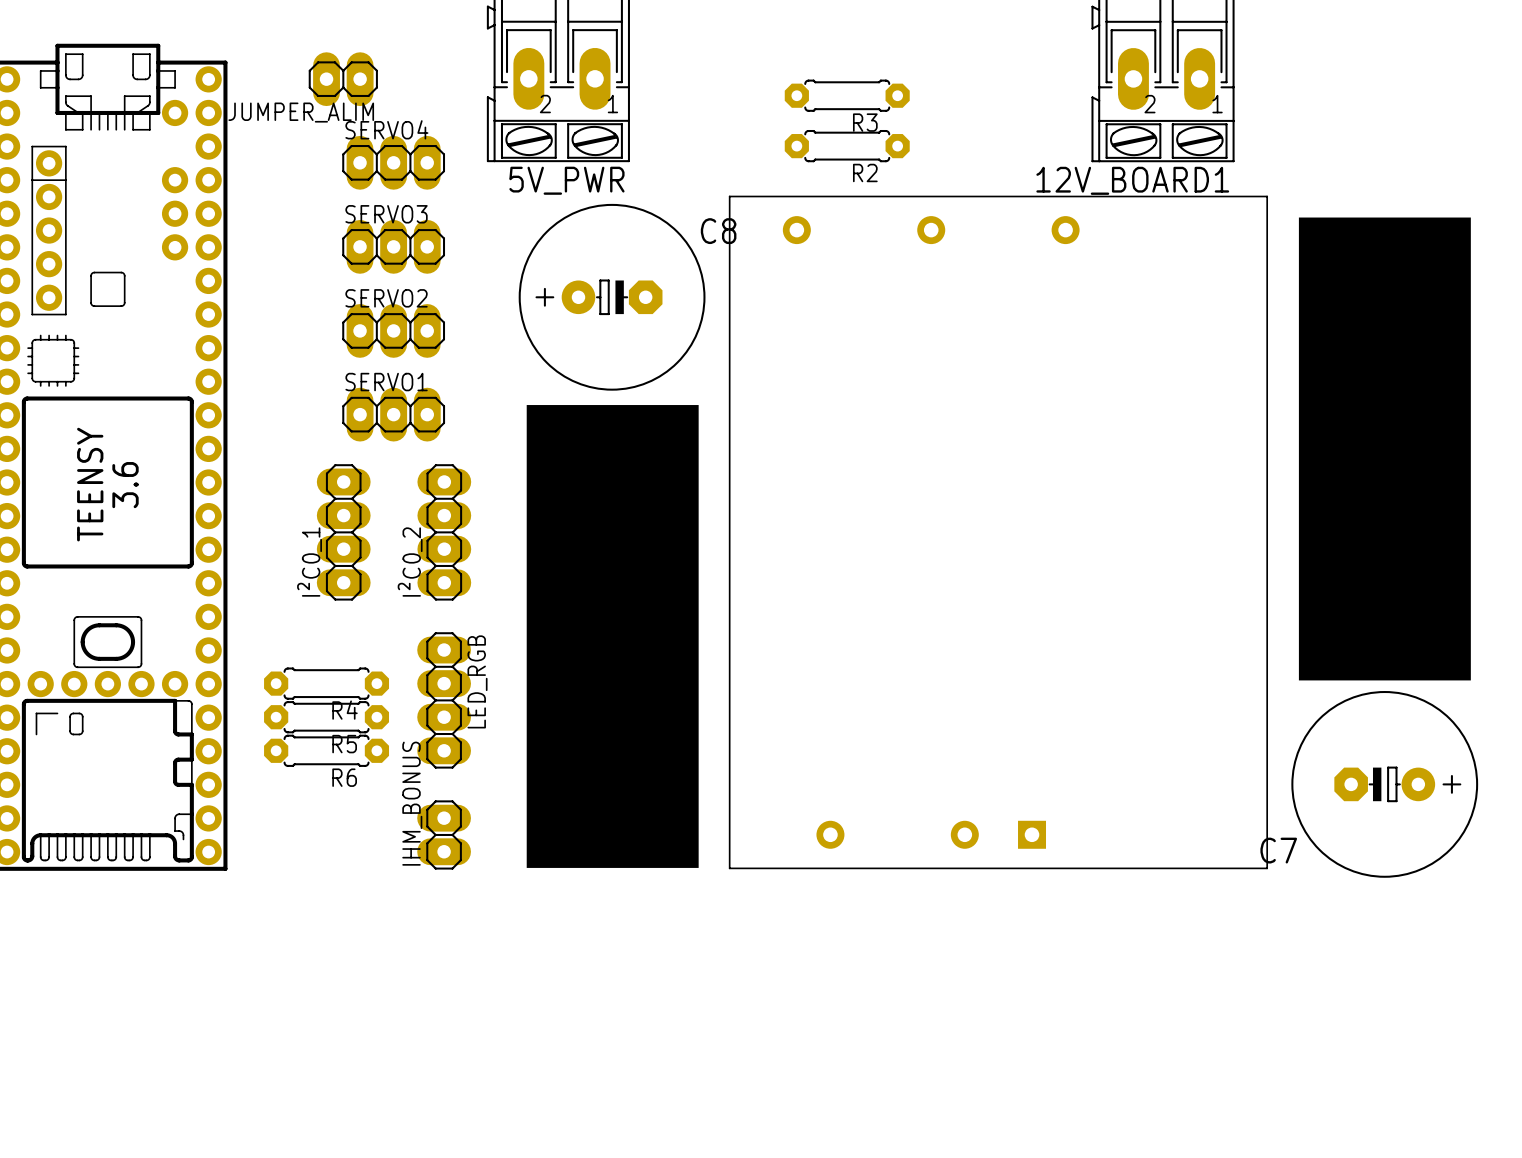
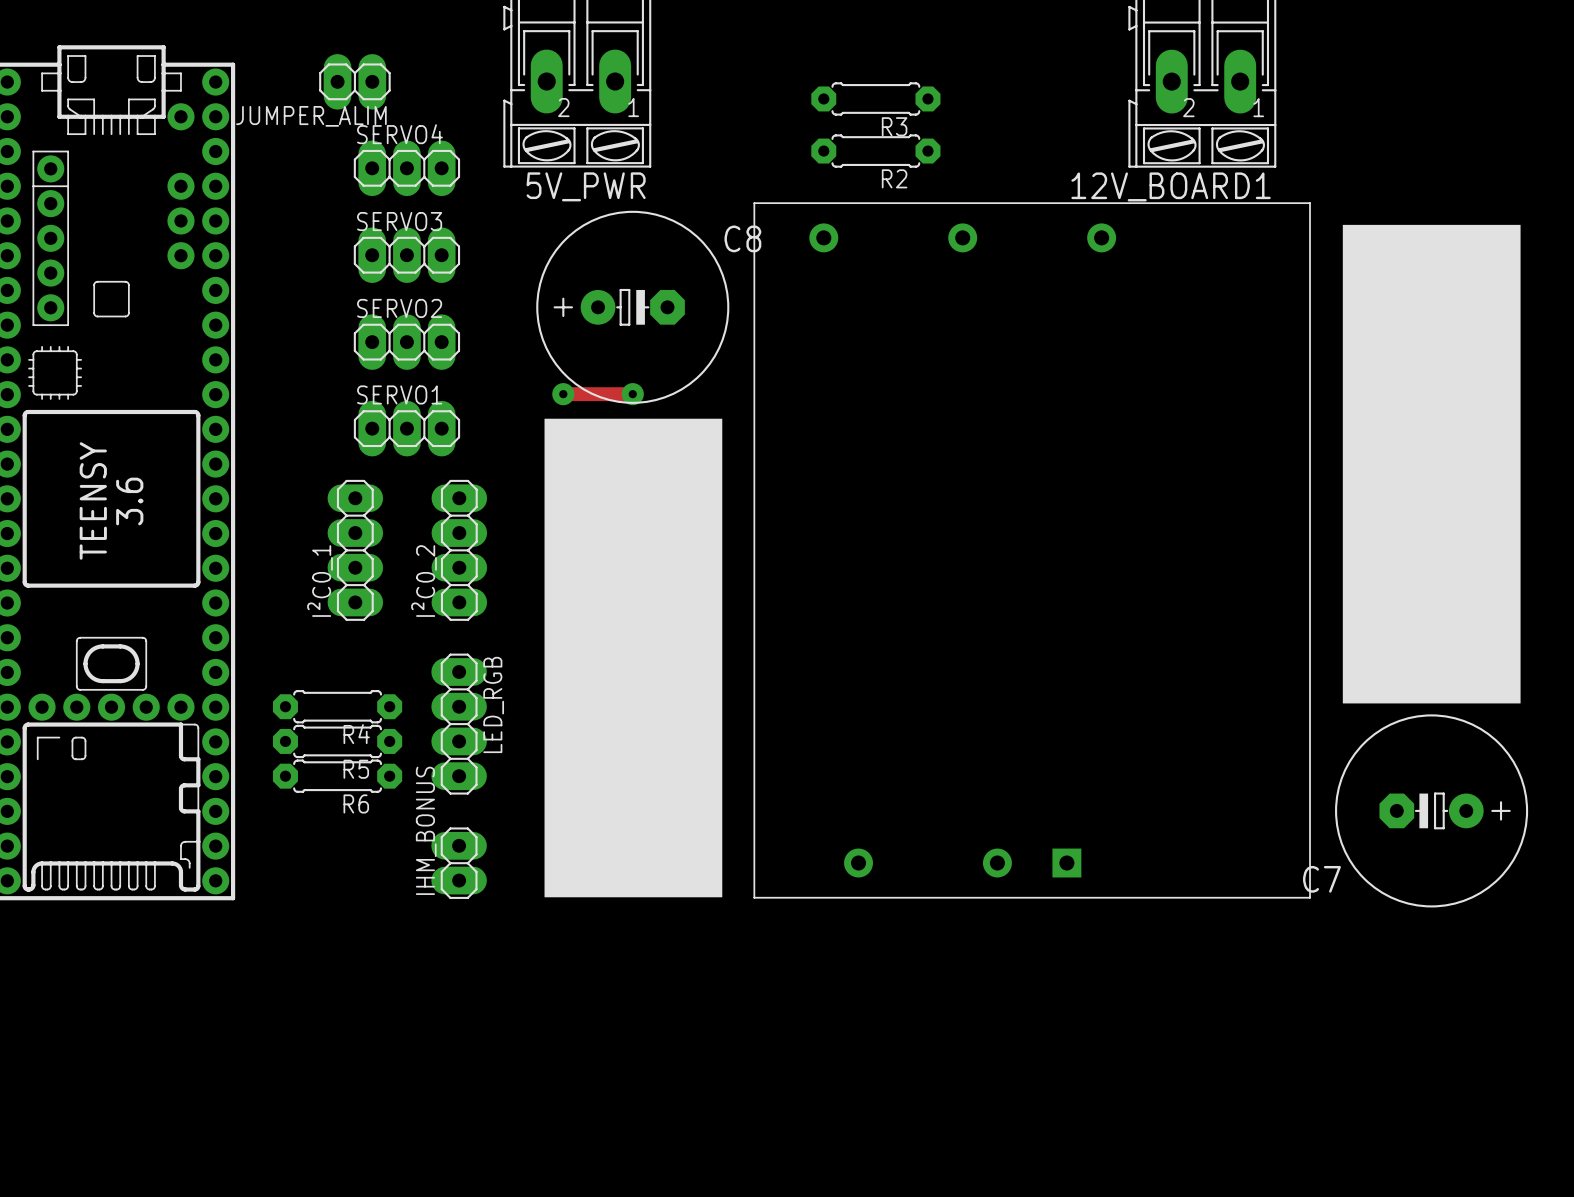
track: none -> (563, 394) (632, 394)
via: none -> (563, 394)
via: none -> (632, 394)

